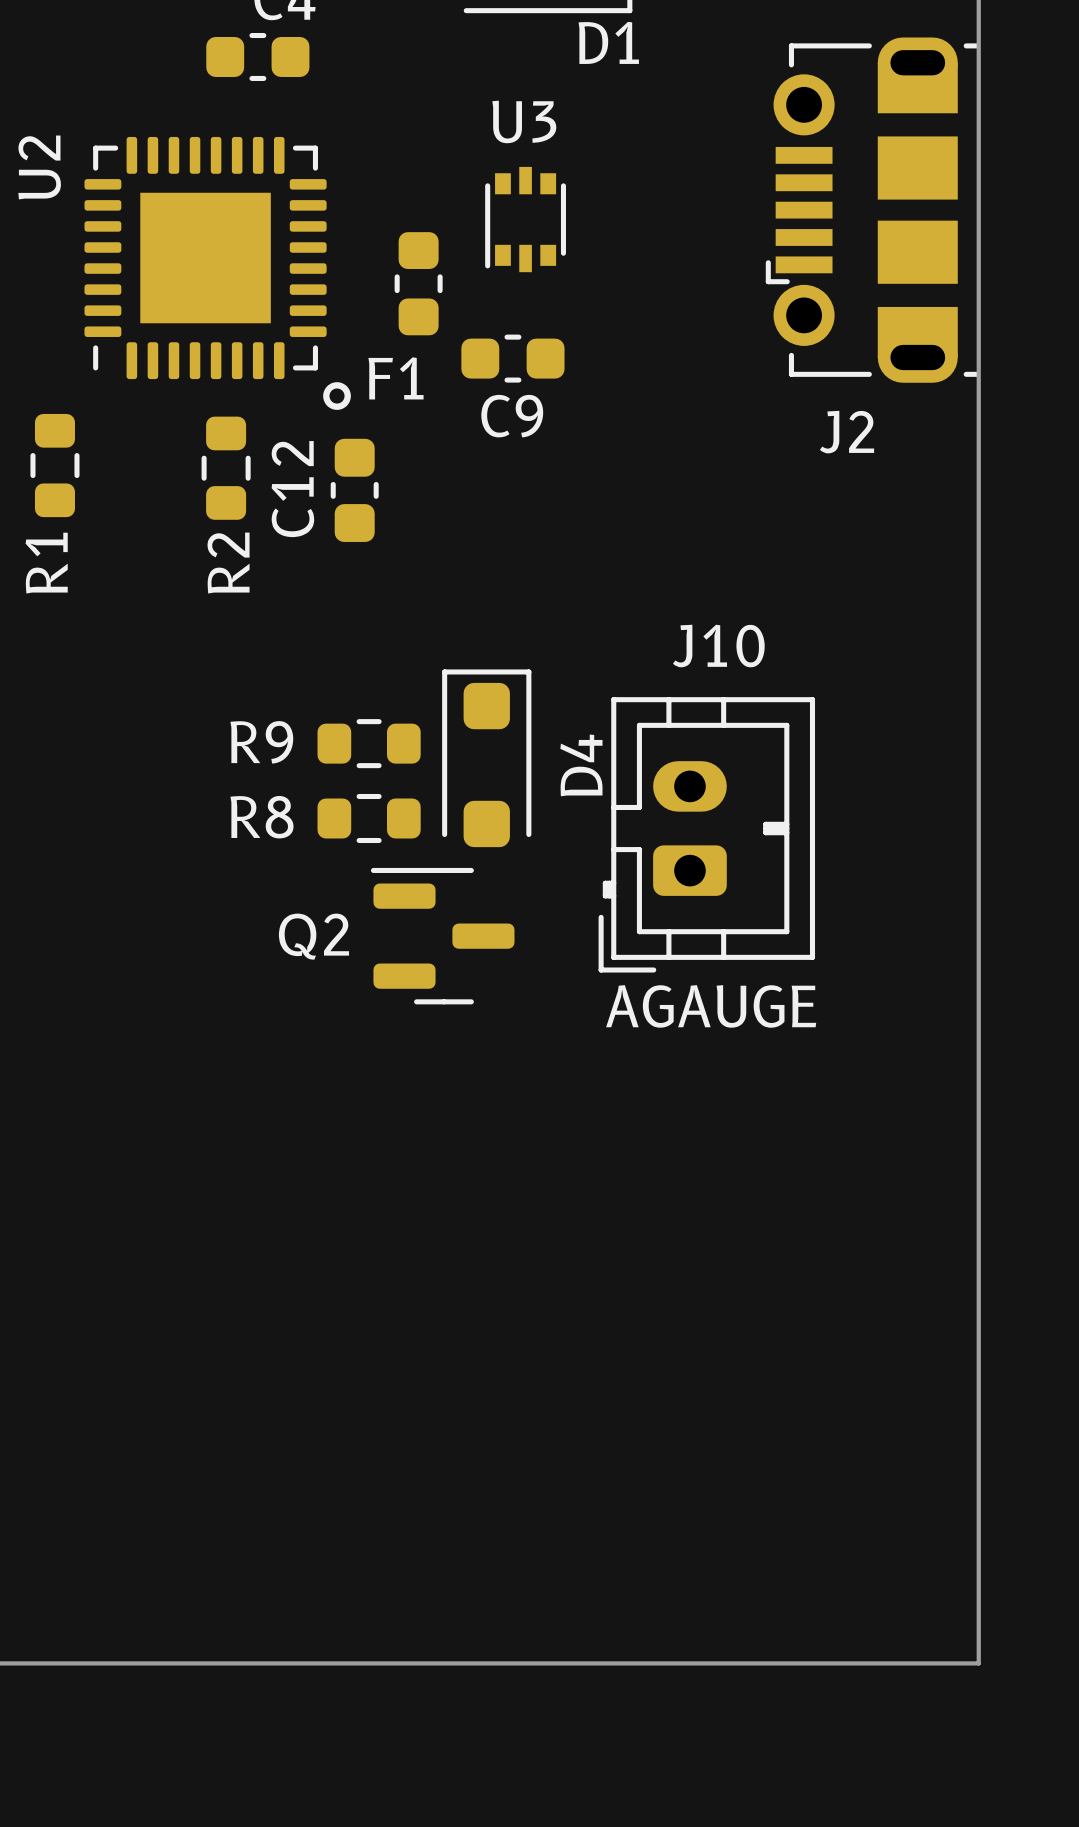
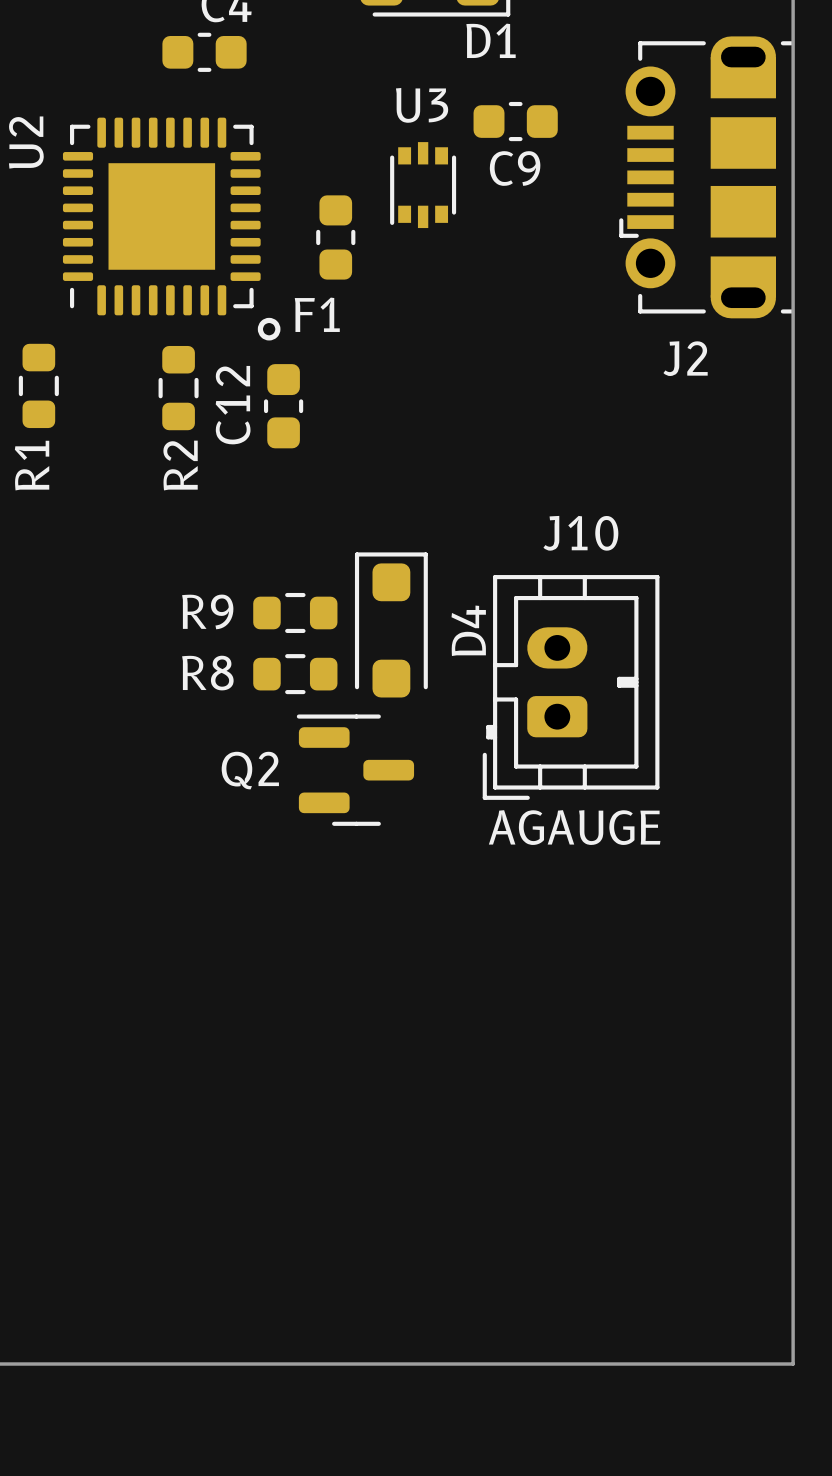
C9 position: (512, 358) -> (515, 121)

